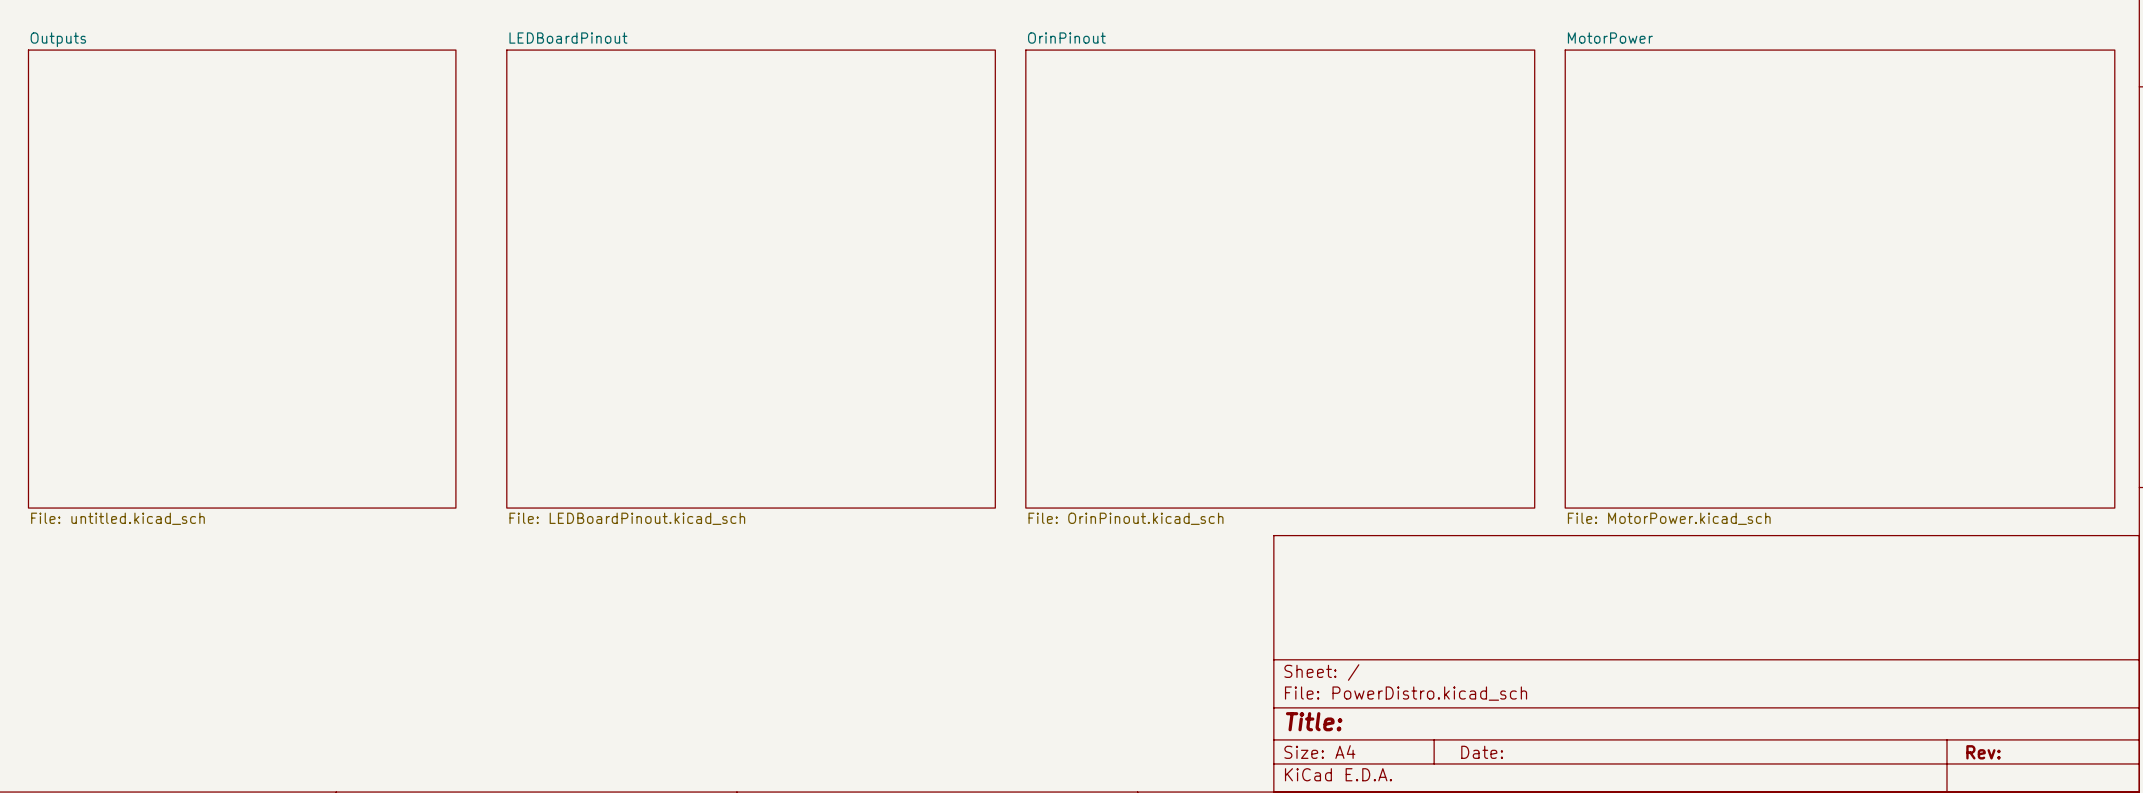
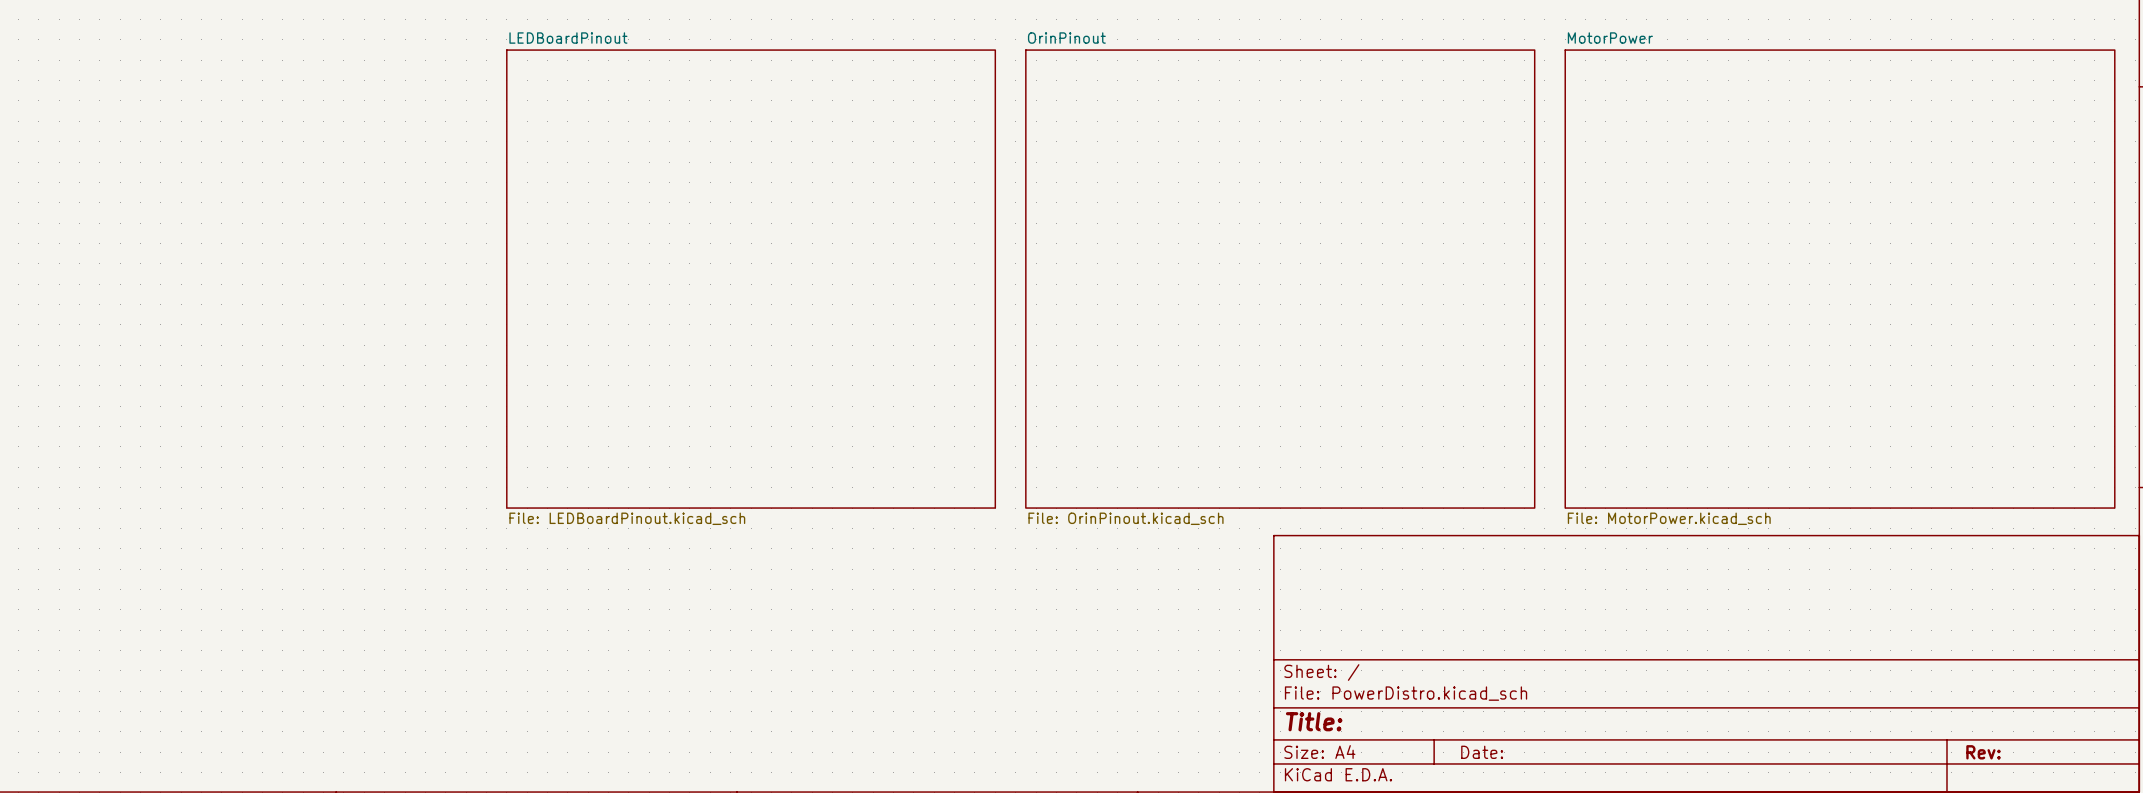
sheet Outputs: File: untitled.kicad_sch (242, 279) -> none

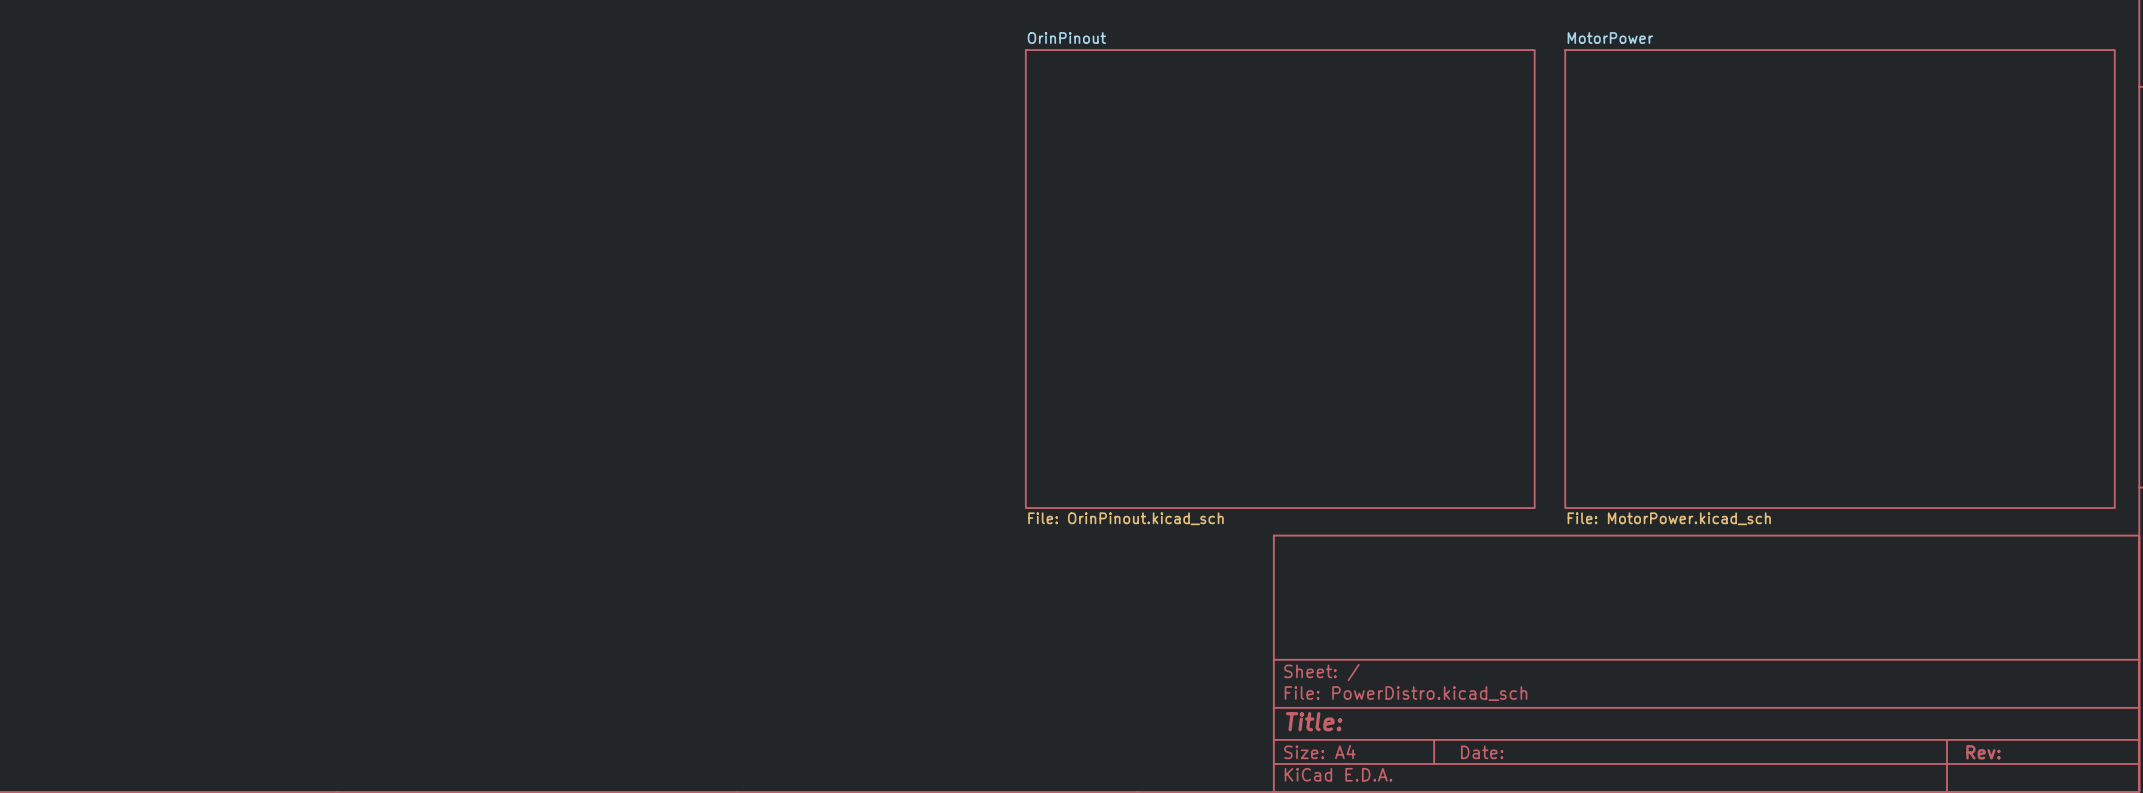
sheet LEDBoardPinout: File: LEDBoardPinout.kicad_sch (751, 279) -> none

